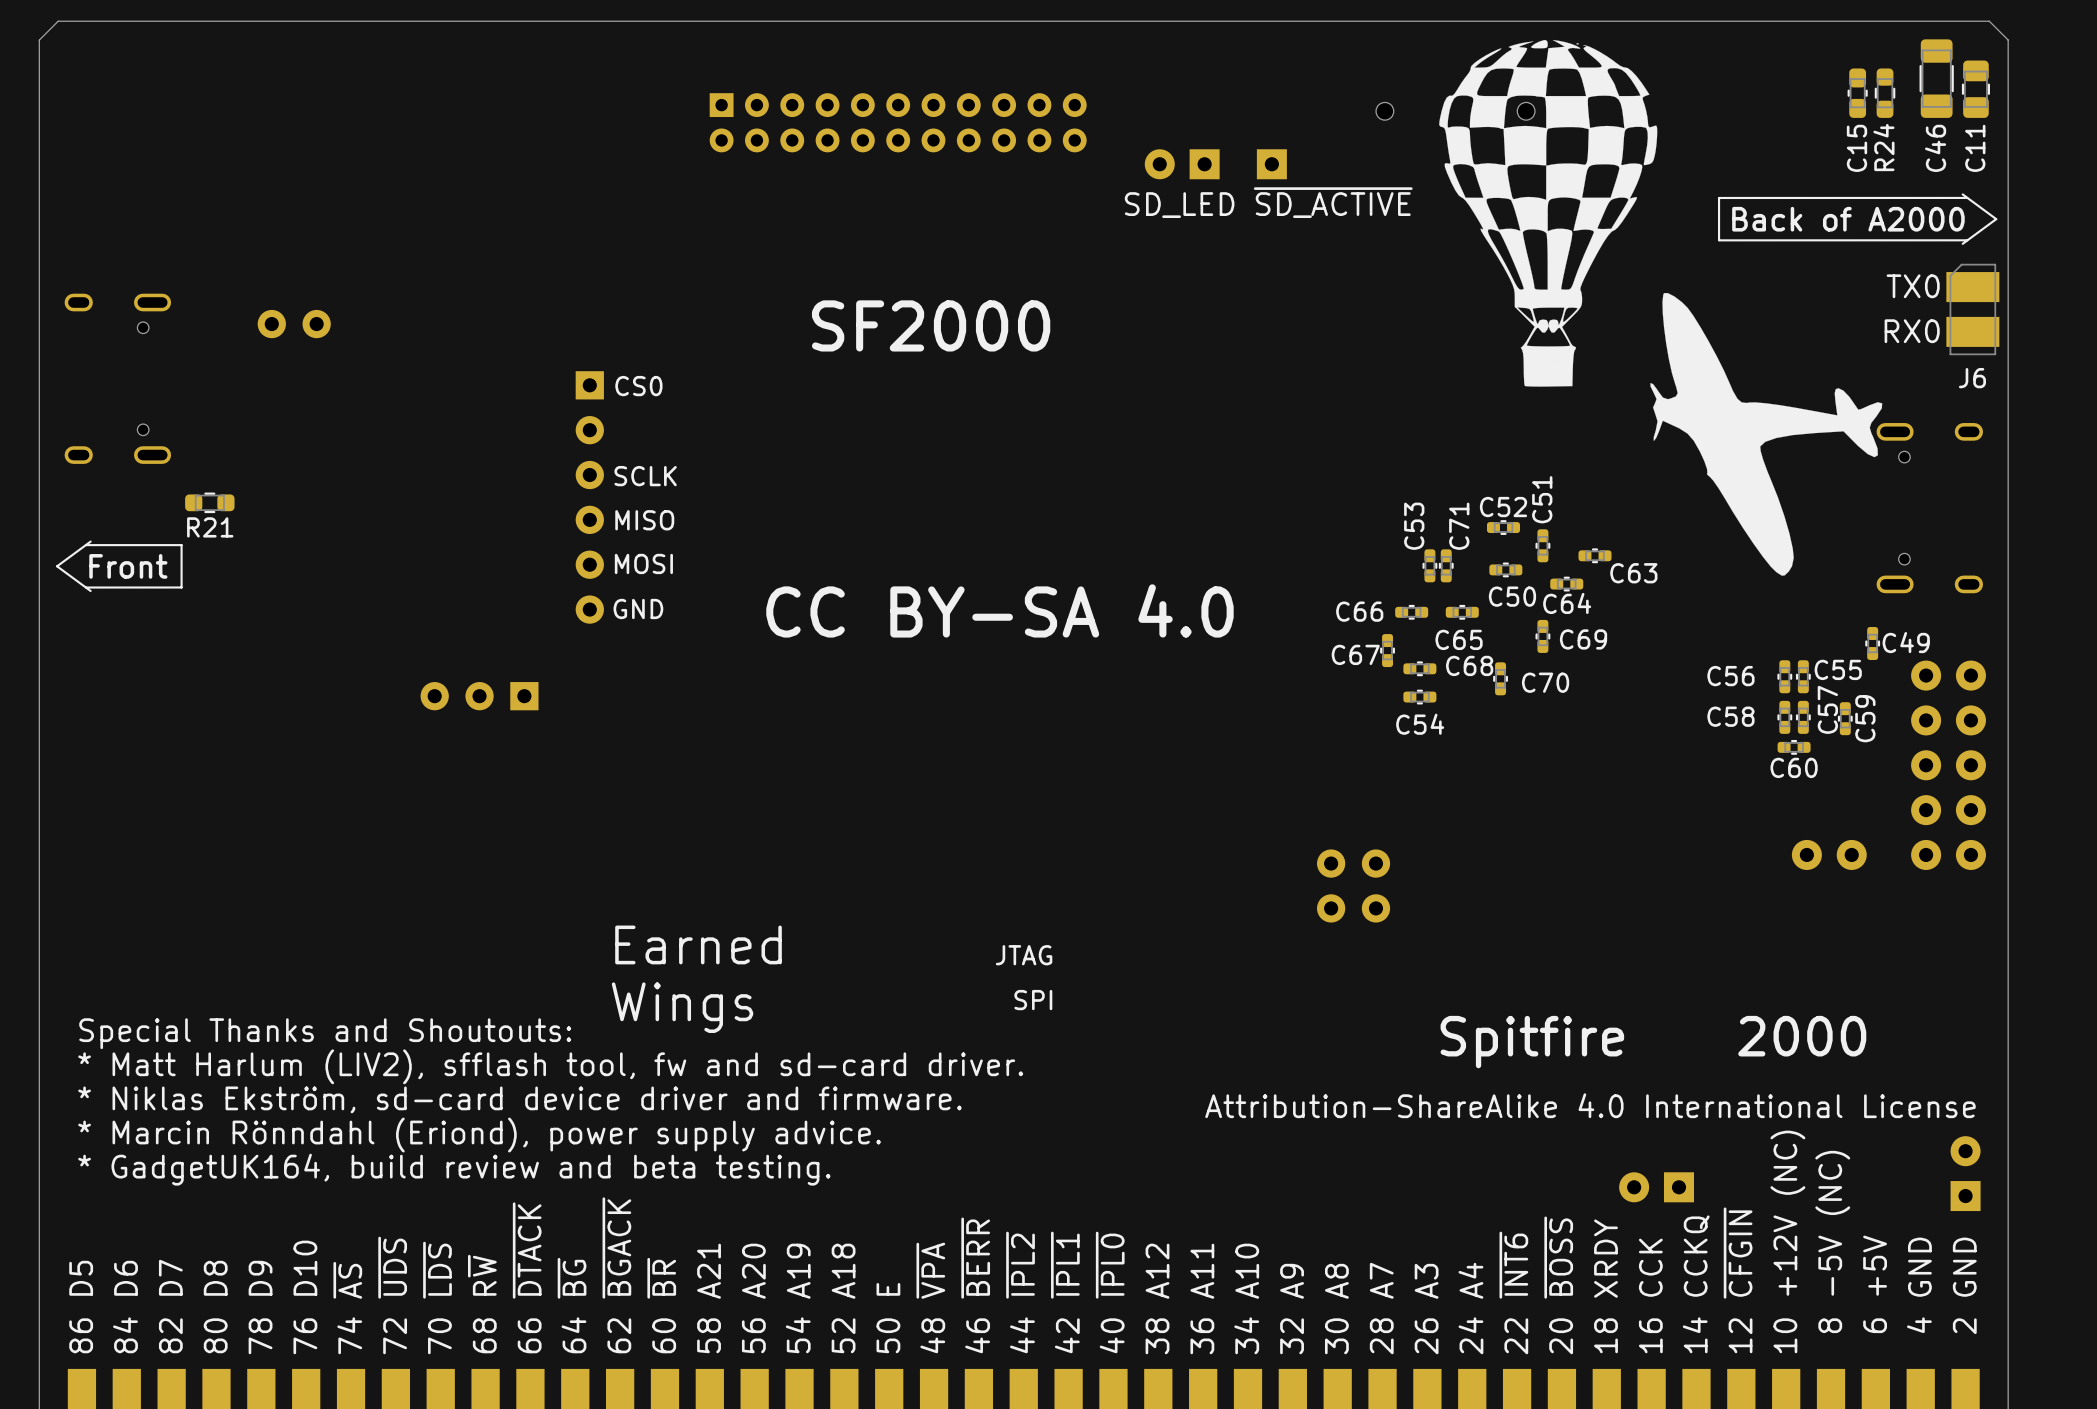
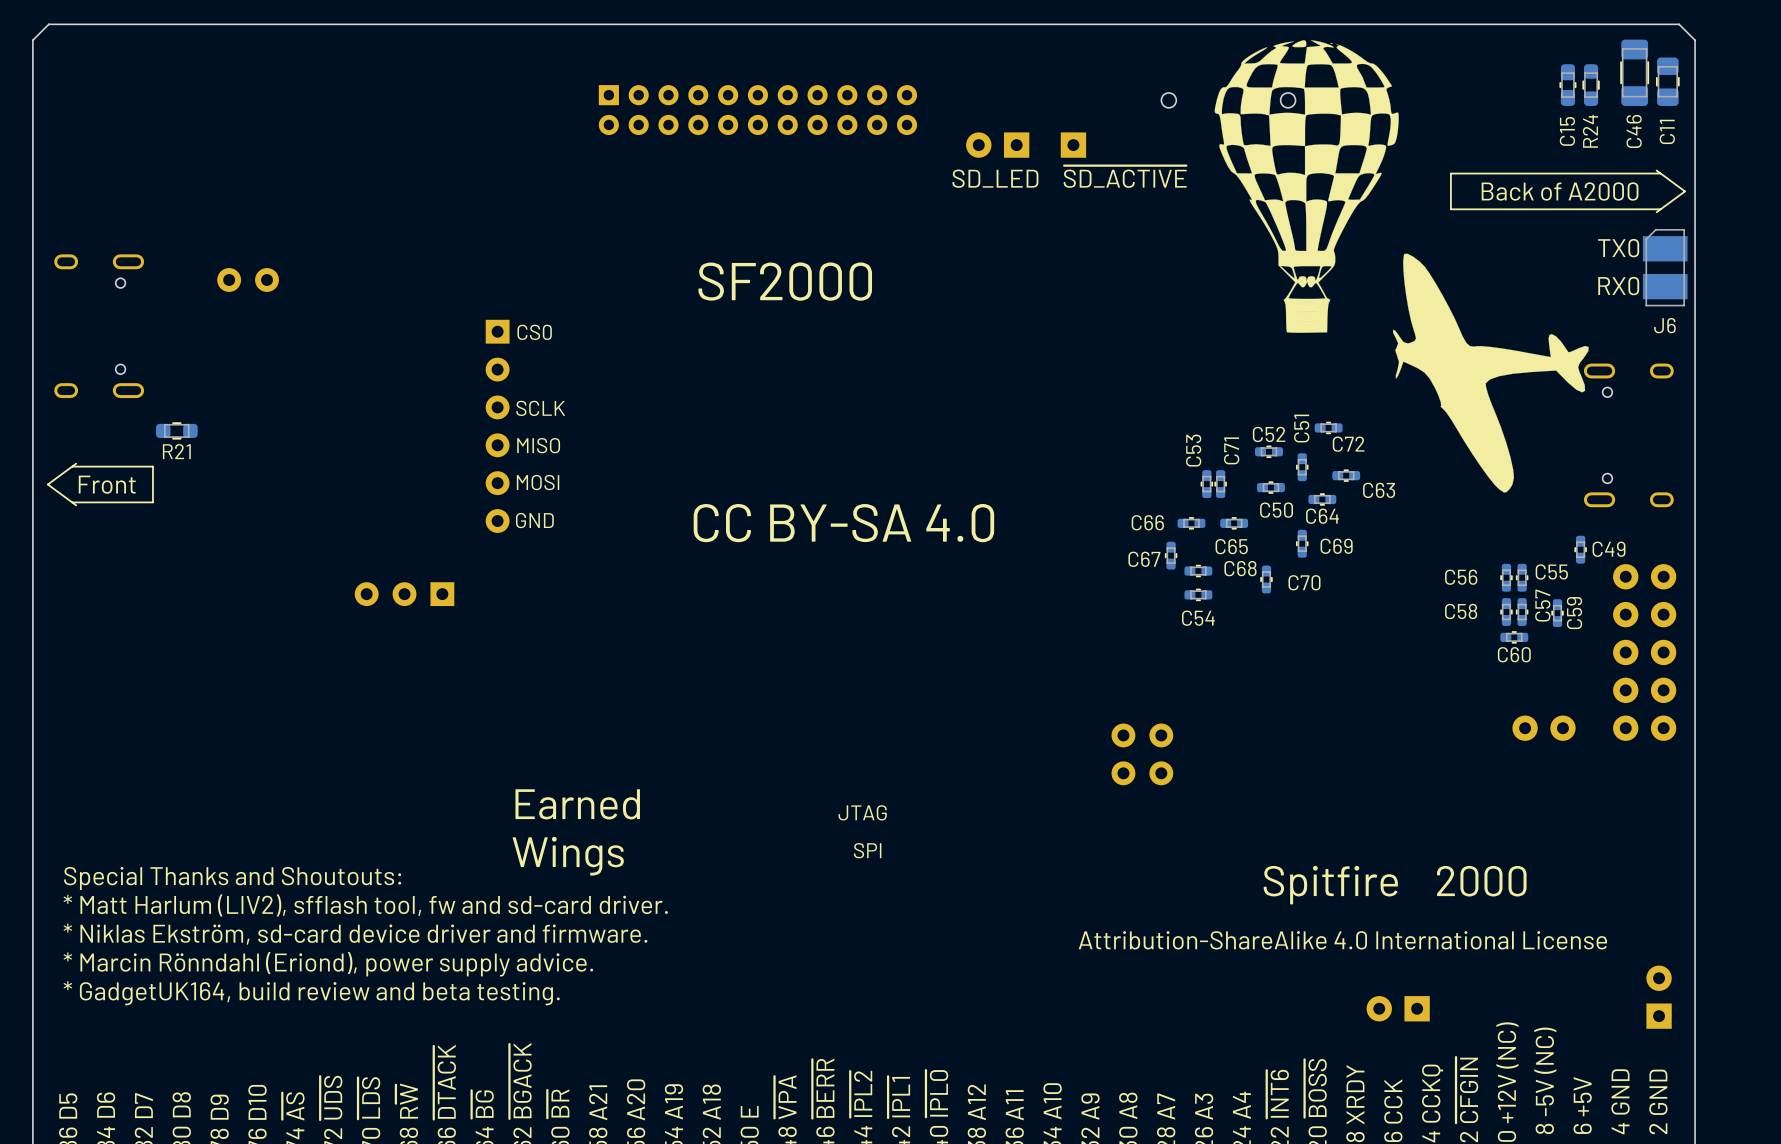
C72: none -> (1328, 427)

